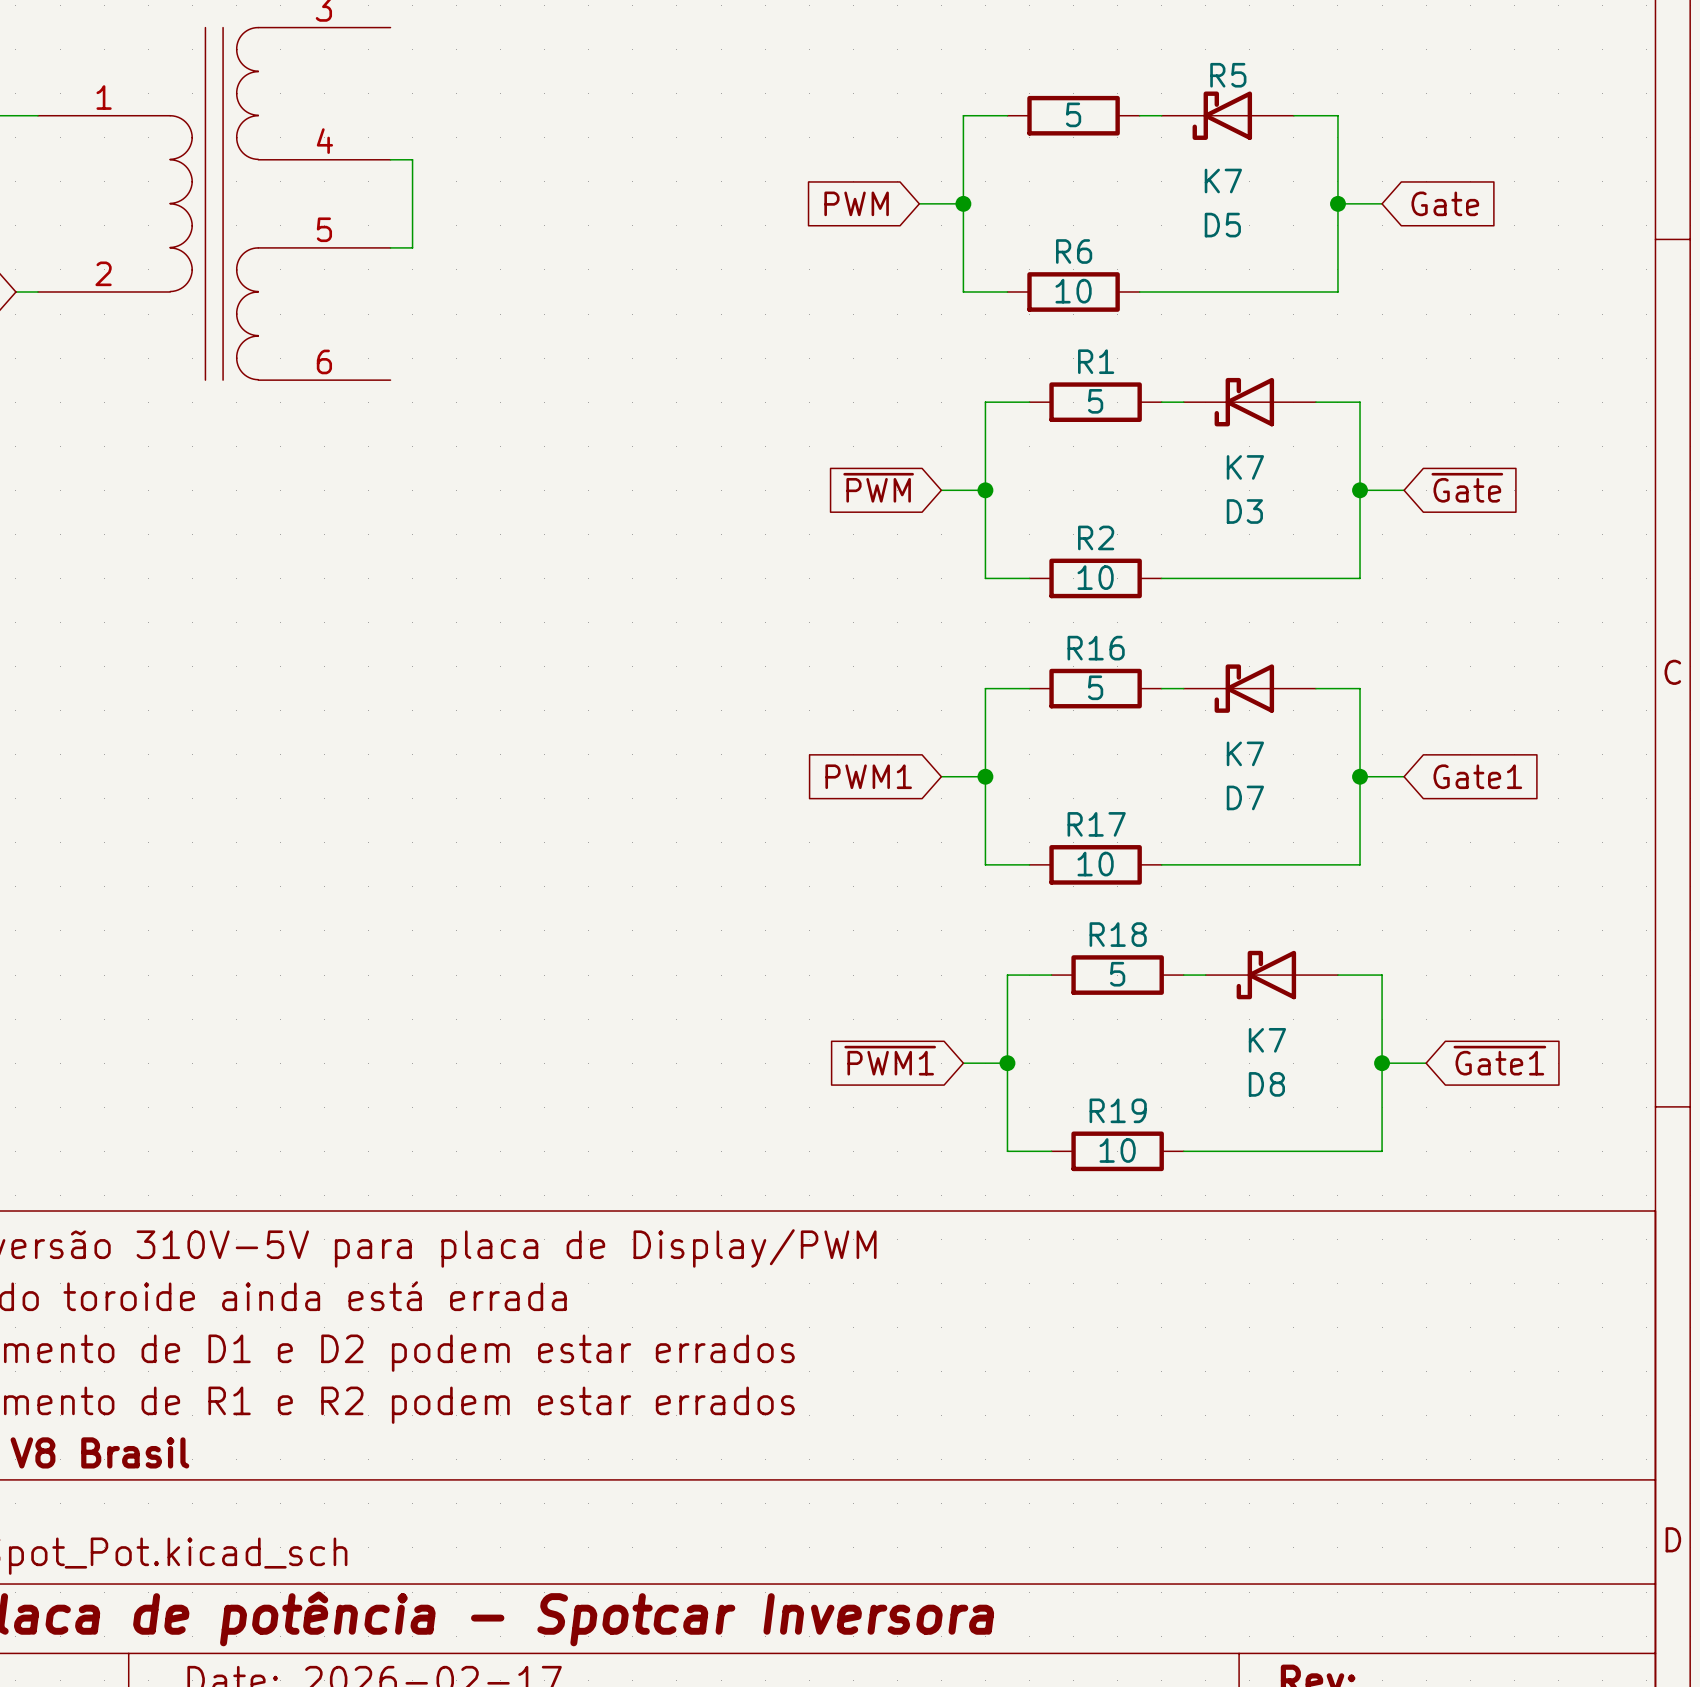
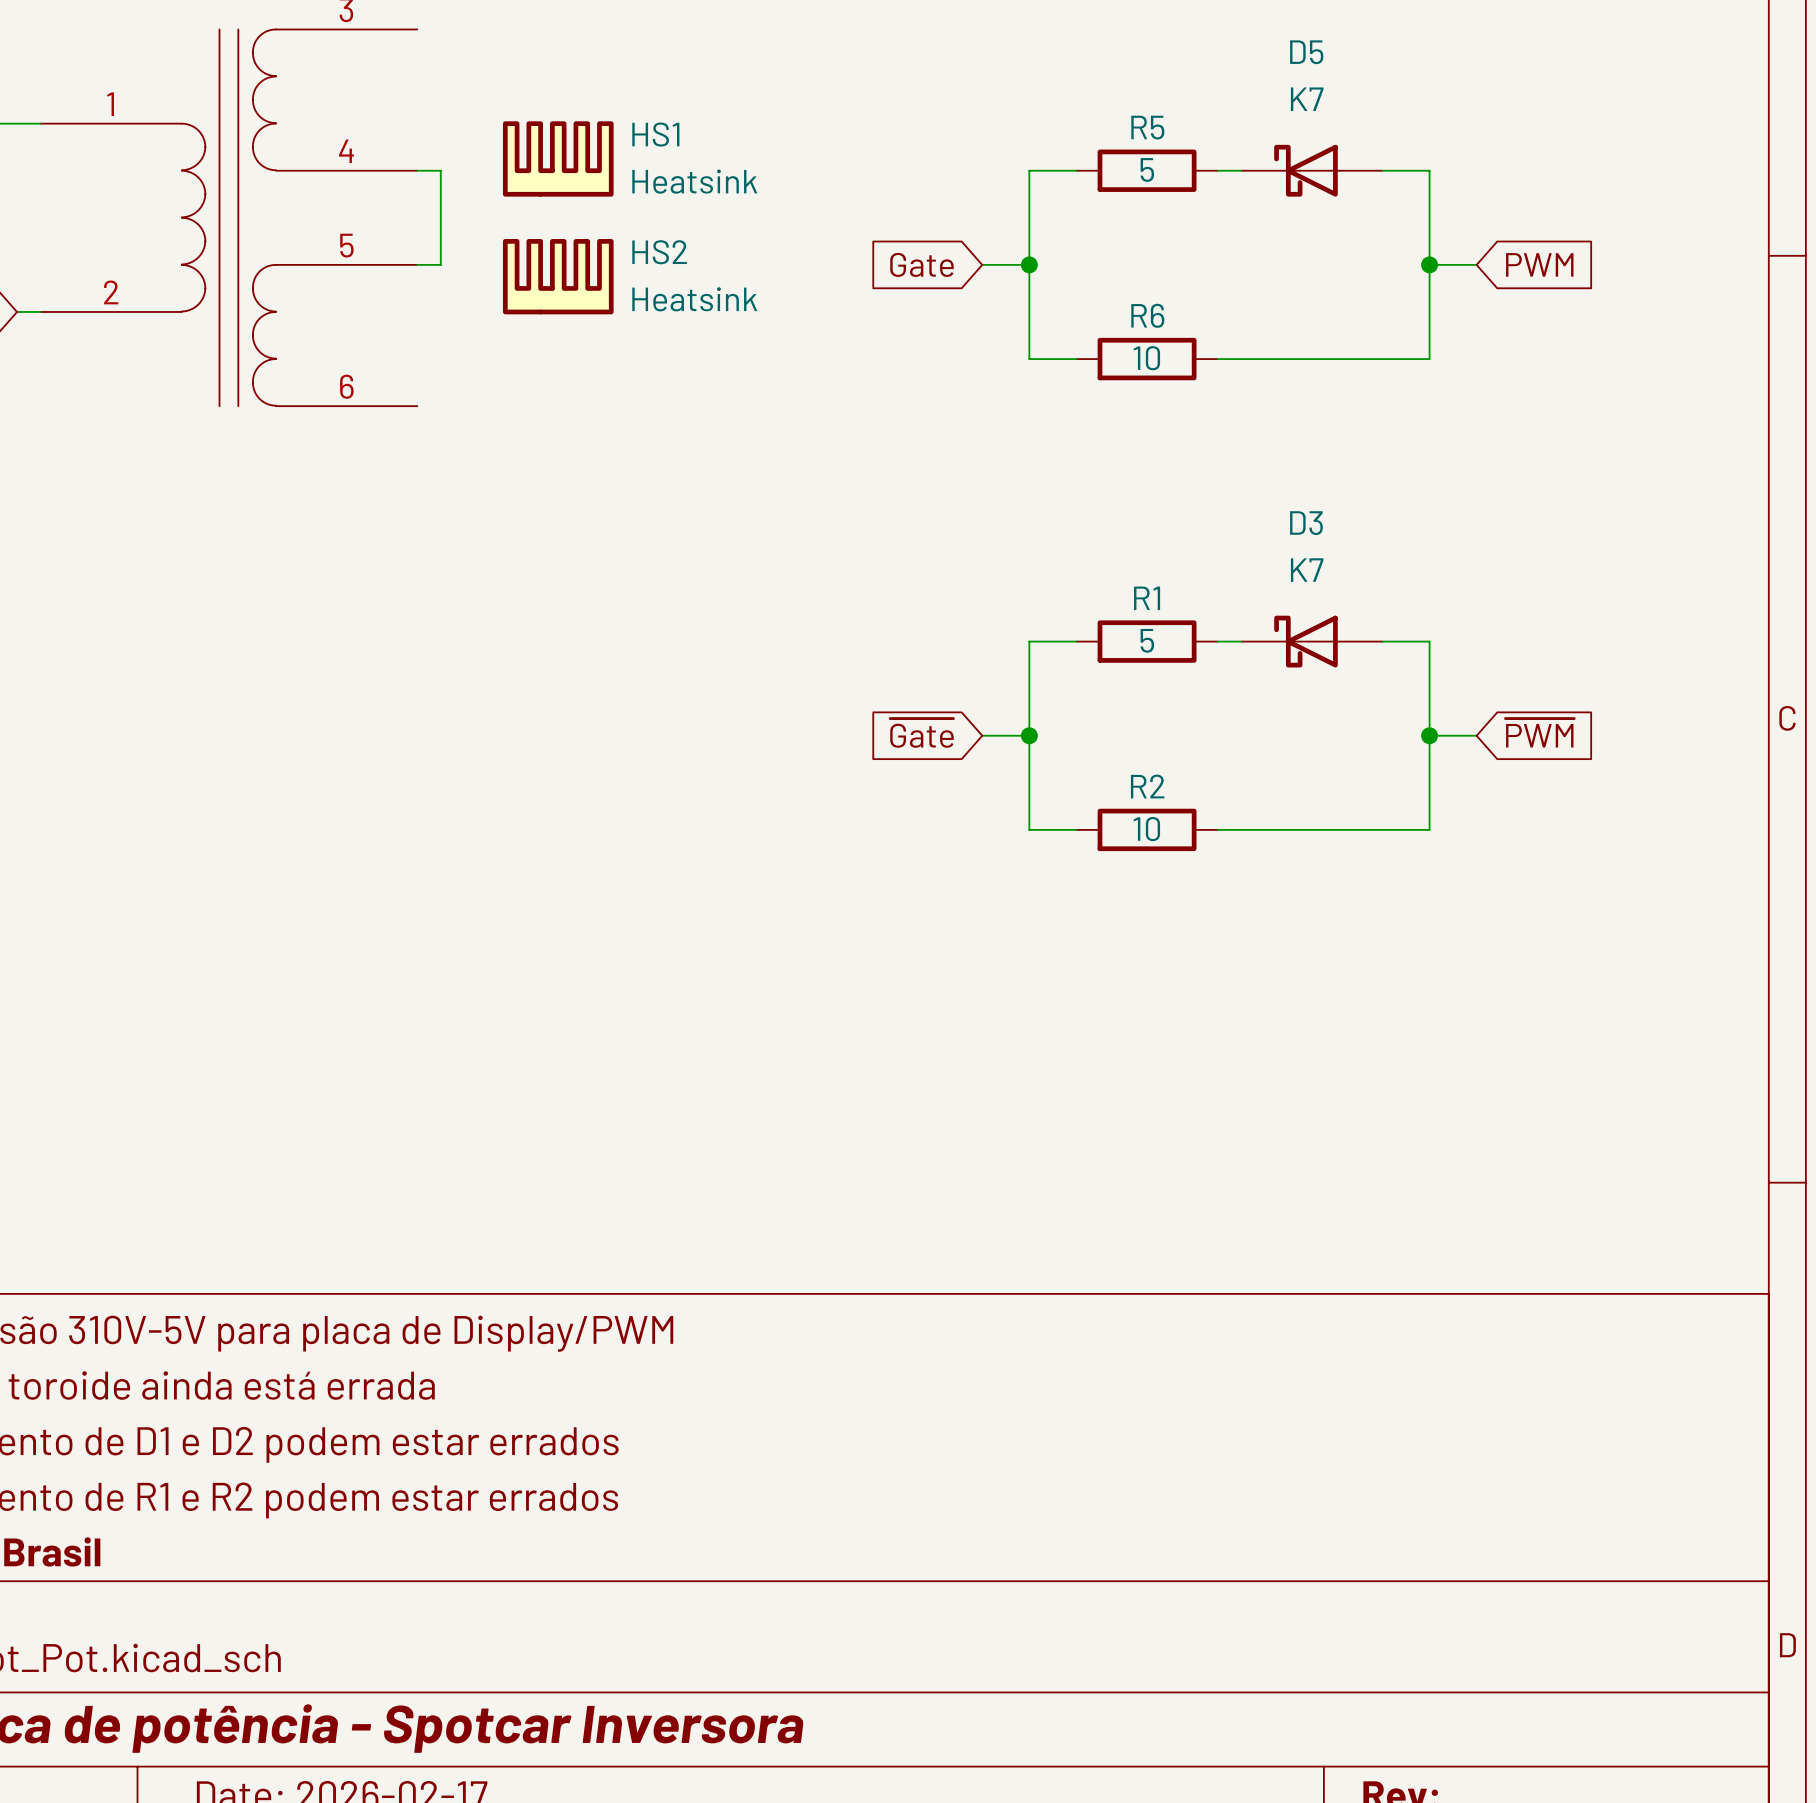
R5 name position: R5 (1228, 75) -> R5 (1147, 127)
wire: (1007, 115) (963, 115) (963, 159) -> (1076, 170) (1029, 170)
R5 position: (1073, 115) -> (1147, 170)
wire: (1139, 115) (1161, 115) -> (1217, 170) (1241, 170)
D5 flip: as is (1222, 115) -> up-down (1305, 170)
wire: (1293, 115) (1337, 115) (1337, 159) -> (1382, 170) (1429, 170)
HS1: none -> Heatsink (558, 158)
global label: PWM (856, 203) -> none
wire: (919, 203) (963, 203) -> (982, 264) (1029, 264)
junction position: (963, 203) -> (1029, 264)
wire: (1337, 203) (1382, 203) -> (1429, 264) (1476, 264)
junction position: (1337, 203) -> (1429, 264)
global label: Gate (1445, 203) -> none
global label: none -> Gate (921, 264)
global label: none -> PWM (1539, 264)
HS2: none -> Heatsink (558, 276)
wire: (963, 291) (1007, 291) -> (1029, 311) (1029, 359) (1076, 359)
R6 position: (1073, 291) -> (1147, 359)
wire: (1139, 291) (1337, 291) -> (1217, 359) (1429, 359) (1429, 311)
wire: (1029, 402) (985, 402) (985, 578) (1029, 578) -> none
R1 position: (1095, 402) -> (1147, 641)
wire: (1161, 402) (1183, 402) -> (1217, 641) (1241, 641)
D3 flip: as is (1244, 402) -> up-down (1305, 641)
D3 position: (1249, 402) -> (1311, 641)
wire: (1315, 402) (1360, 402) (1360, 578) (1161, 578) -> (1382, 641) (1429, 641) (1429, 829) (1217, 829)
global label: ~{PWM} (878, 487) -> none
global label: ~{Gate} (1467, 487) -> none
wire: (941, 490) (985, 490) -> (982, 735) (1029, 735)
junction: (985, 490) -> none
wire: (1360, 490) (1404, 490) -> none
junction: (1360, 490) -> none
R2 position: (1095, 578) -> (1147, 829)
global label: none -> ~{Gate} (921, 733)
global label: none -> ~{PWM} (1539, 733)
wire: (1029, 688) (985, 688) (985, 864) (1029, 864) -> none
R16: 5 (1095, 688) -> none
wire: (1161, 688) (1183, 688) -> (1052, 829) (1076, 829)
D7: K7 (1249, 688) -> none
wire: (1315, 688) (1337, 688) -> none
wire: (1360, 688) (1360, 864) (1161, 864) -> (1453, 735) (1476, 735)
global label: PWM1 (868, 776) -> none
wire: (941, 776) (963, 776) -> (1076, 641) (1029, 641) (1029, 829)
junction position: (985, 776) -> (1029, 735)
wire: (1360, 776) (1404, 776) -> none
junction position: (1360, 776) -> (1429, 735)
global label: Gate1 (1477, 776) -> none
R17: 10 (1095, 864) -> none
wire: (1051, 975) (1007, 975) (1007, 1151) (1051, 1151) -> none
R18: 5 (1117, 975) -> none
wire: (1183, 975) (1205, 975) -> none
D8: K7 (1271, 975) -> none
wire: (1337, 975) (1382, 975) (1382, 1151) (1183, 1151) -> none
global label: ~{PWM1} (890, 1060) -> none
global label: ~{Gate1} (1499, 1060) -> none
wire: (963, 1063) (1007, 1063) -> none
junction: (1007, 1063) -> none
wire: (1382, 1063) (1426, 1063) -> none
junction: (1382, 1063) -> none
R19: 10 (1117, 1151) -> none

